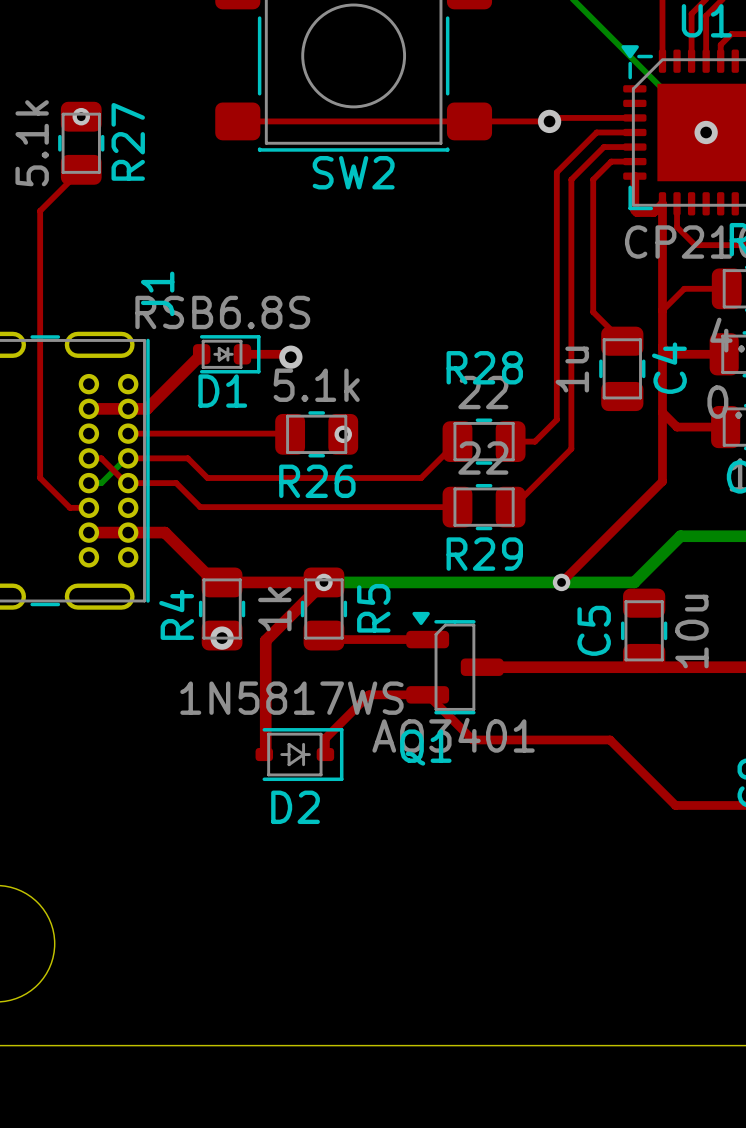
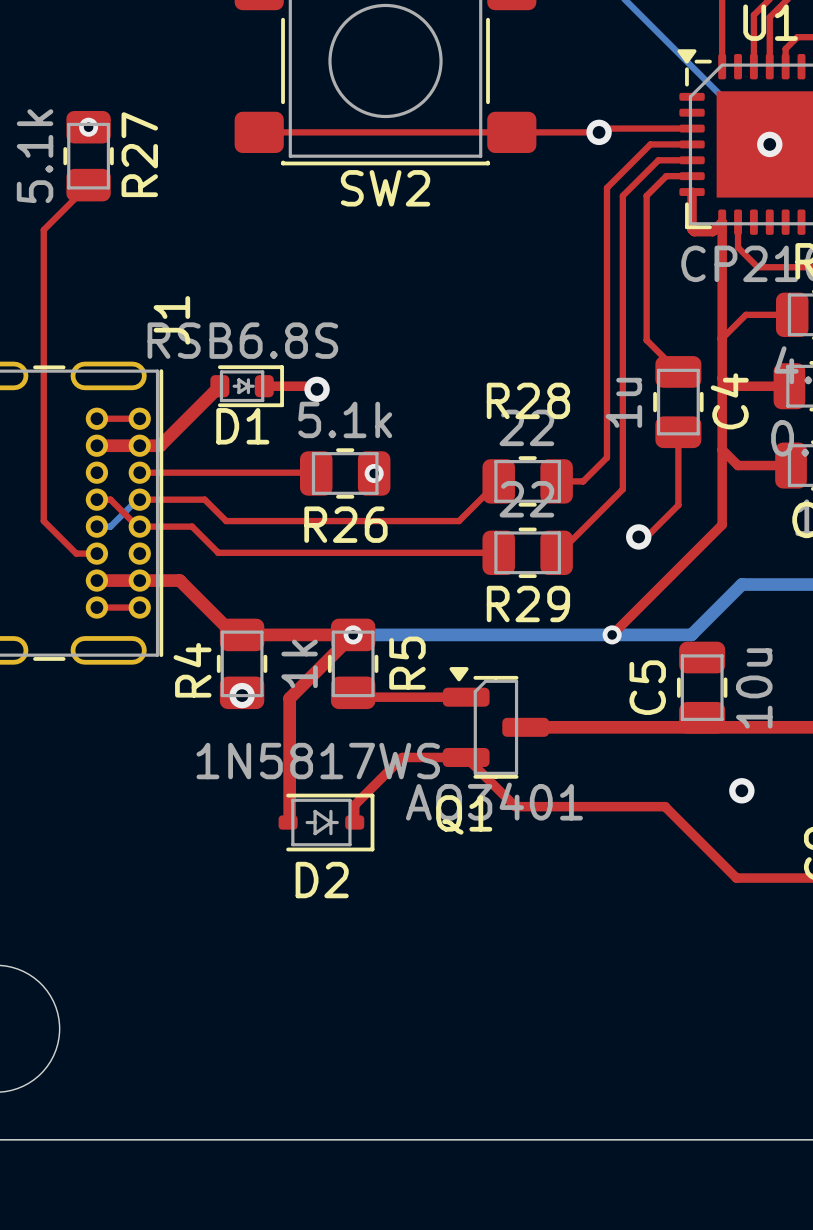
top track: none -> (96, 418) (139, 418)
top track: none -> (678, 432) (678, 505) (646, 536) (638, 536)
via: none -> (638, 536)
top track: none -> (96, 607) (139, 607)
via: none -> (741, 790)

